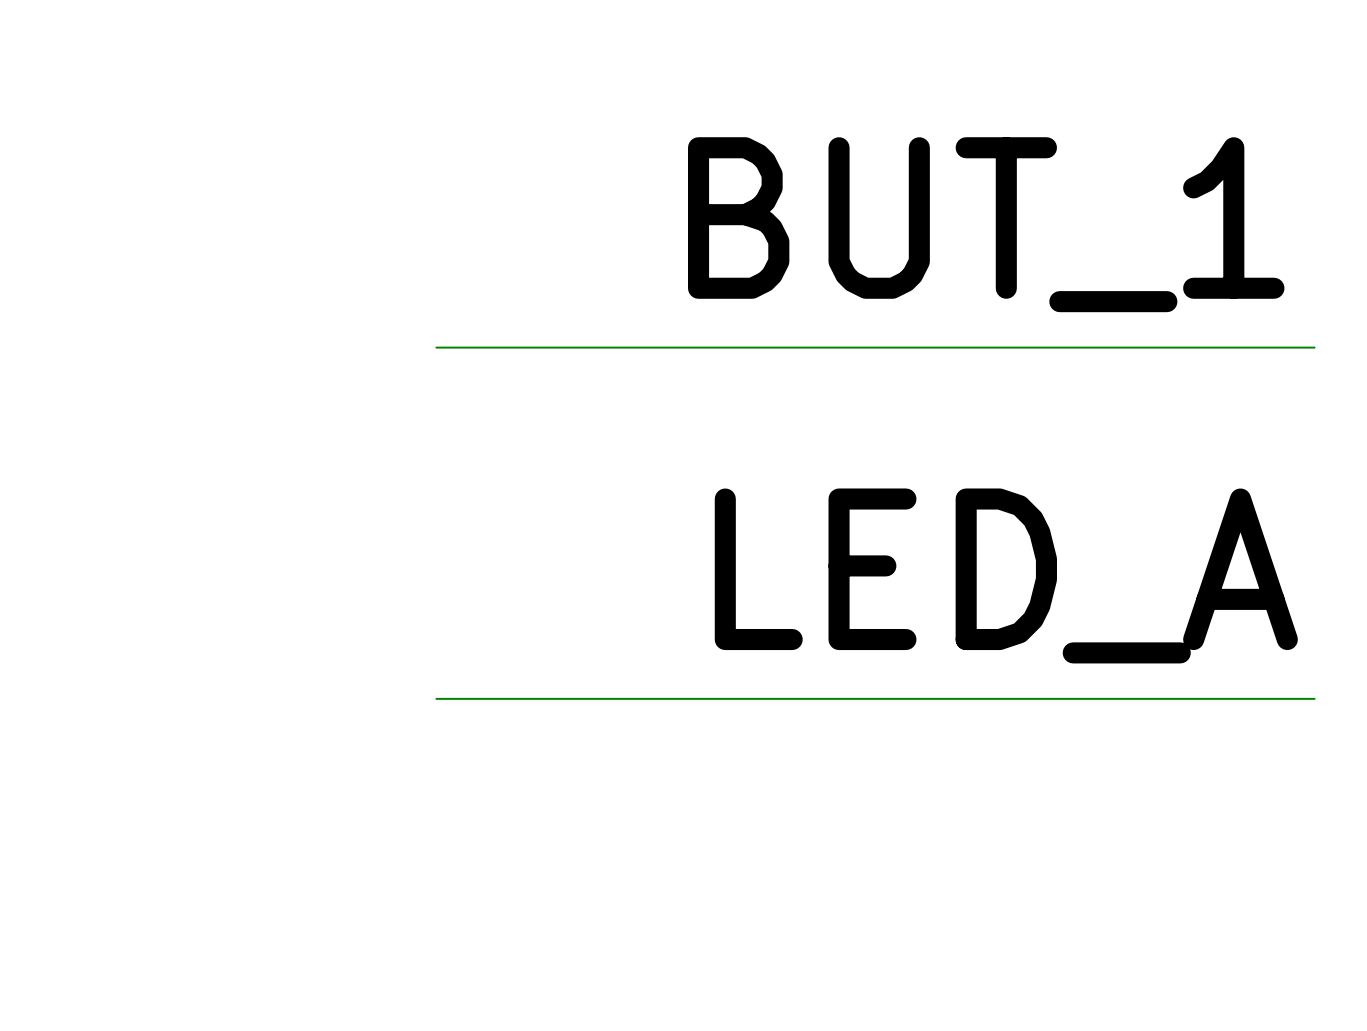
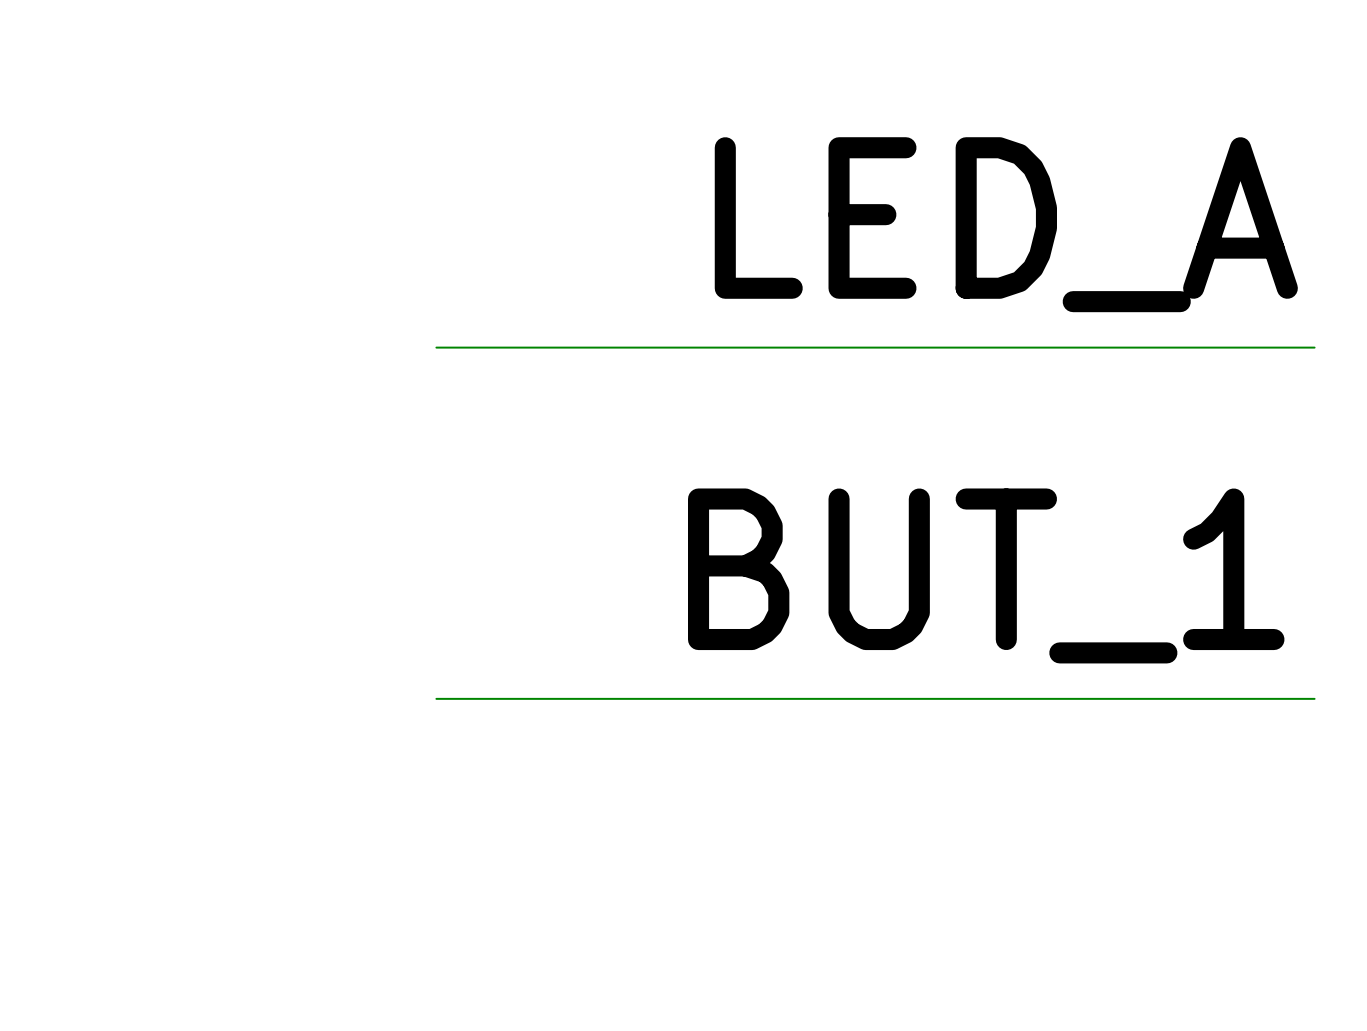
label: BUT_1 (986, 224) -> LED_A (1006, 224)
label: LED_A (1006, 575) -> BUT_1 (986, 575)

